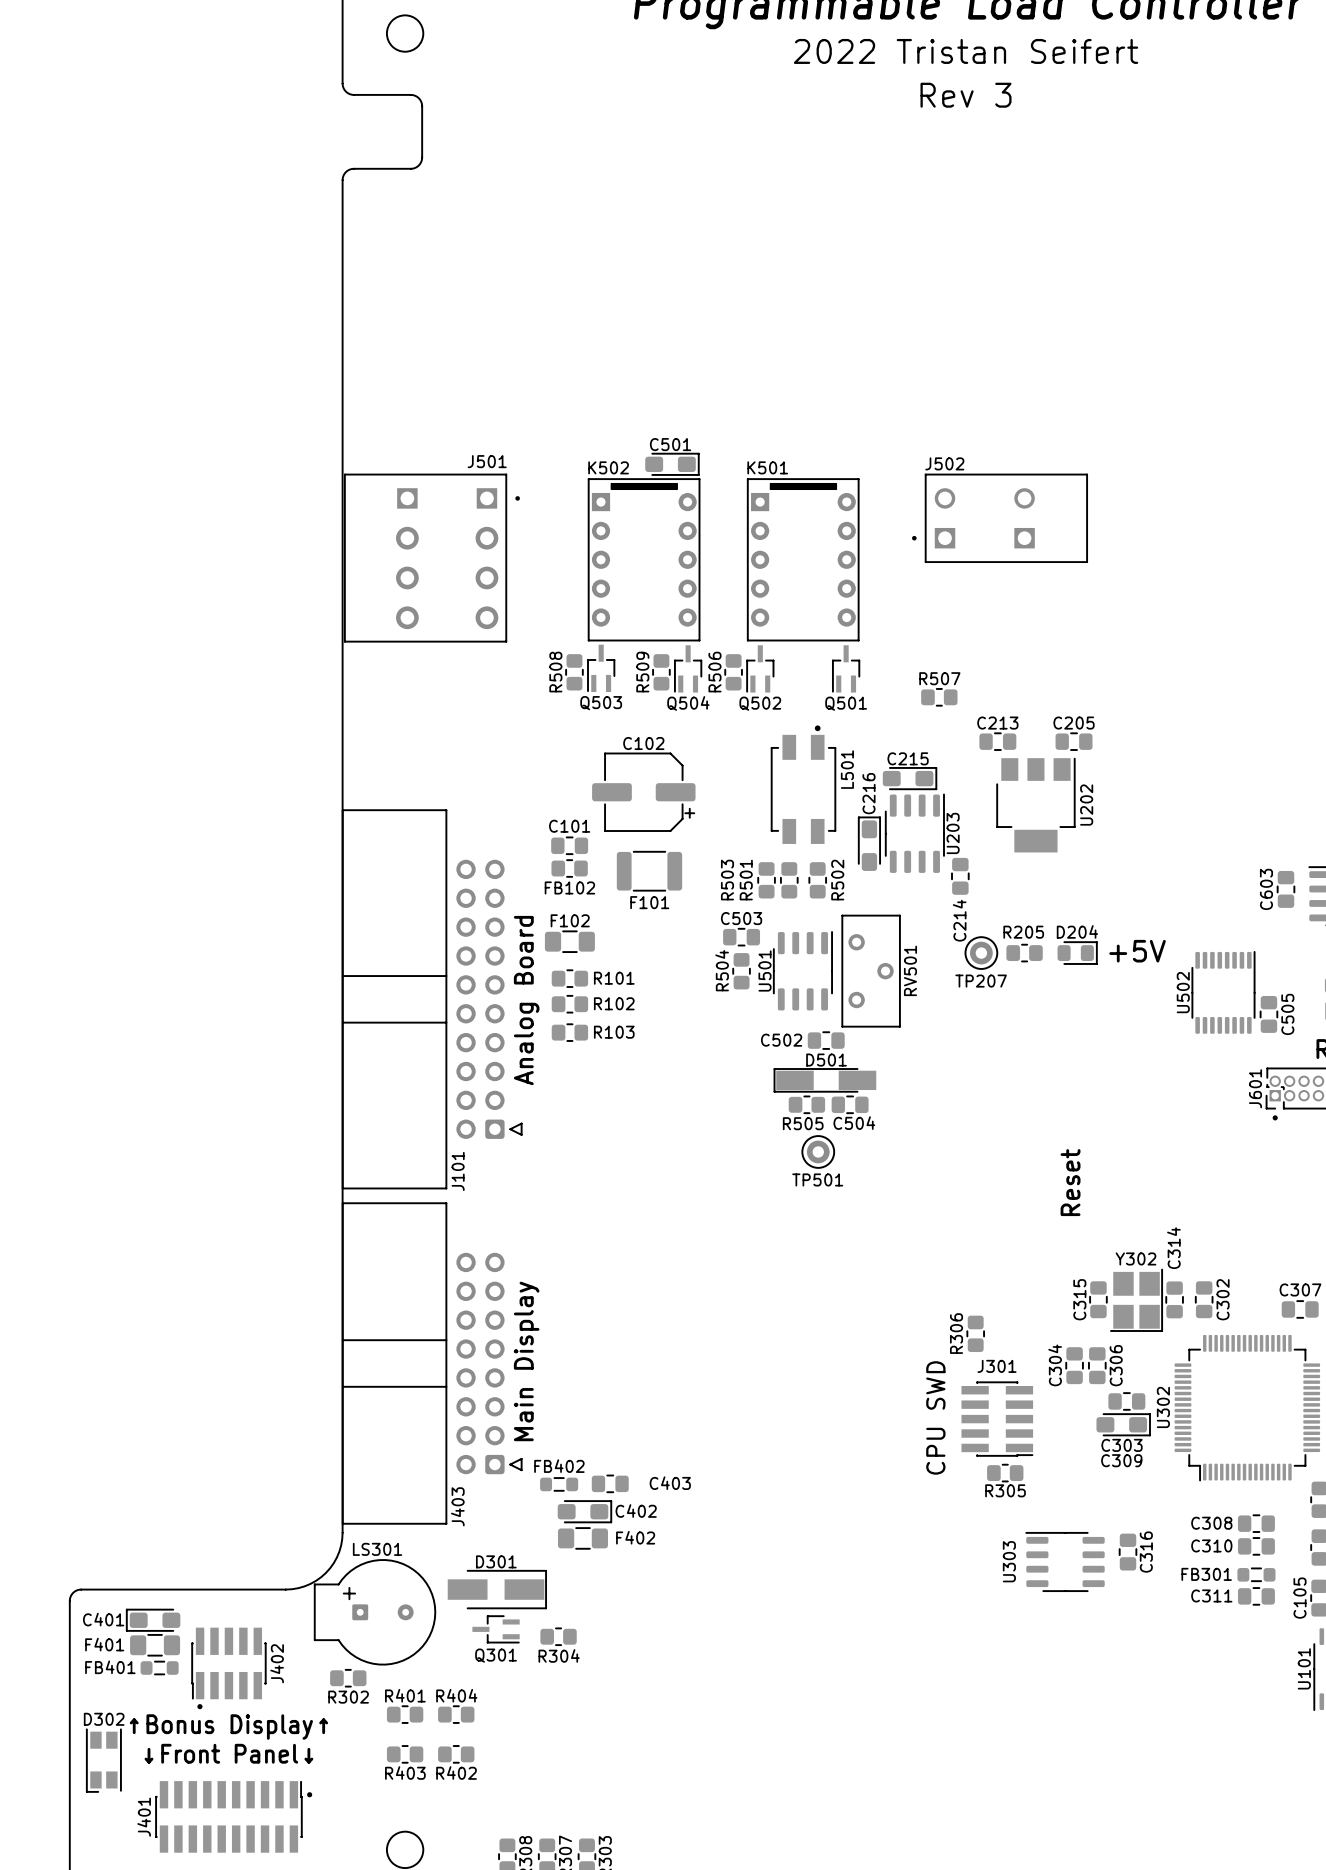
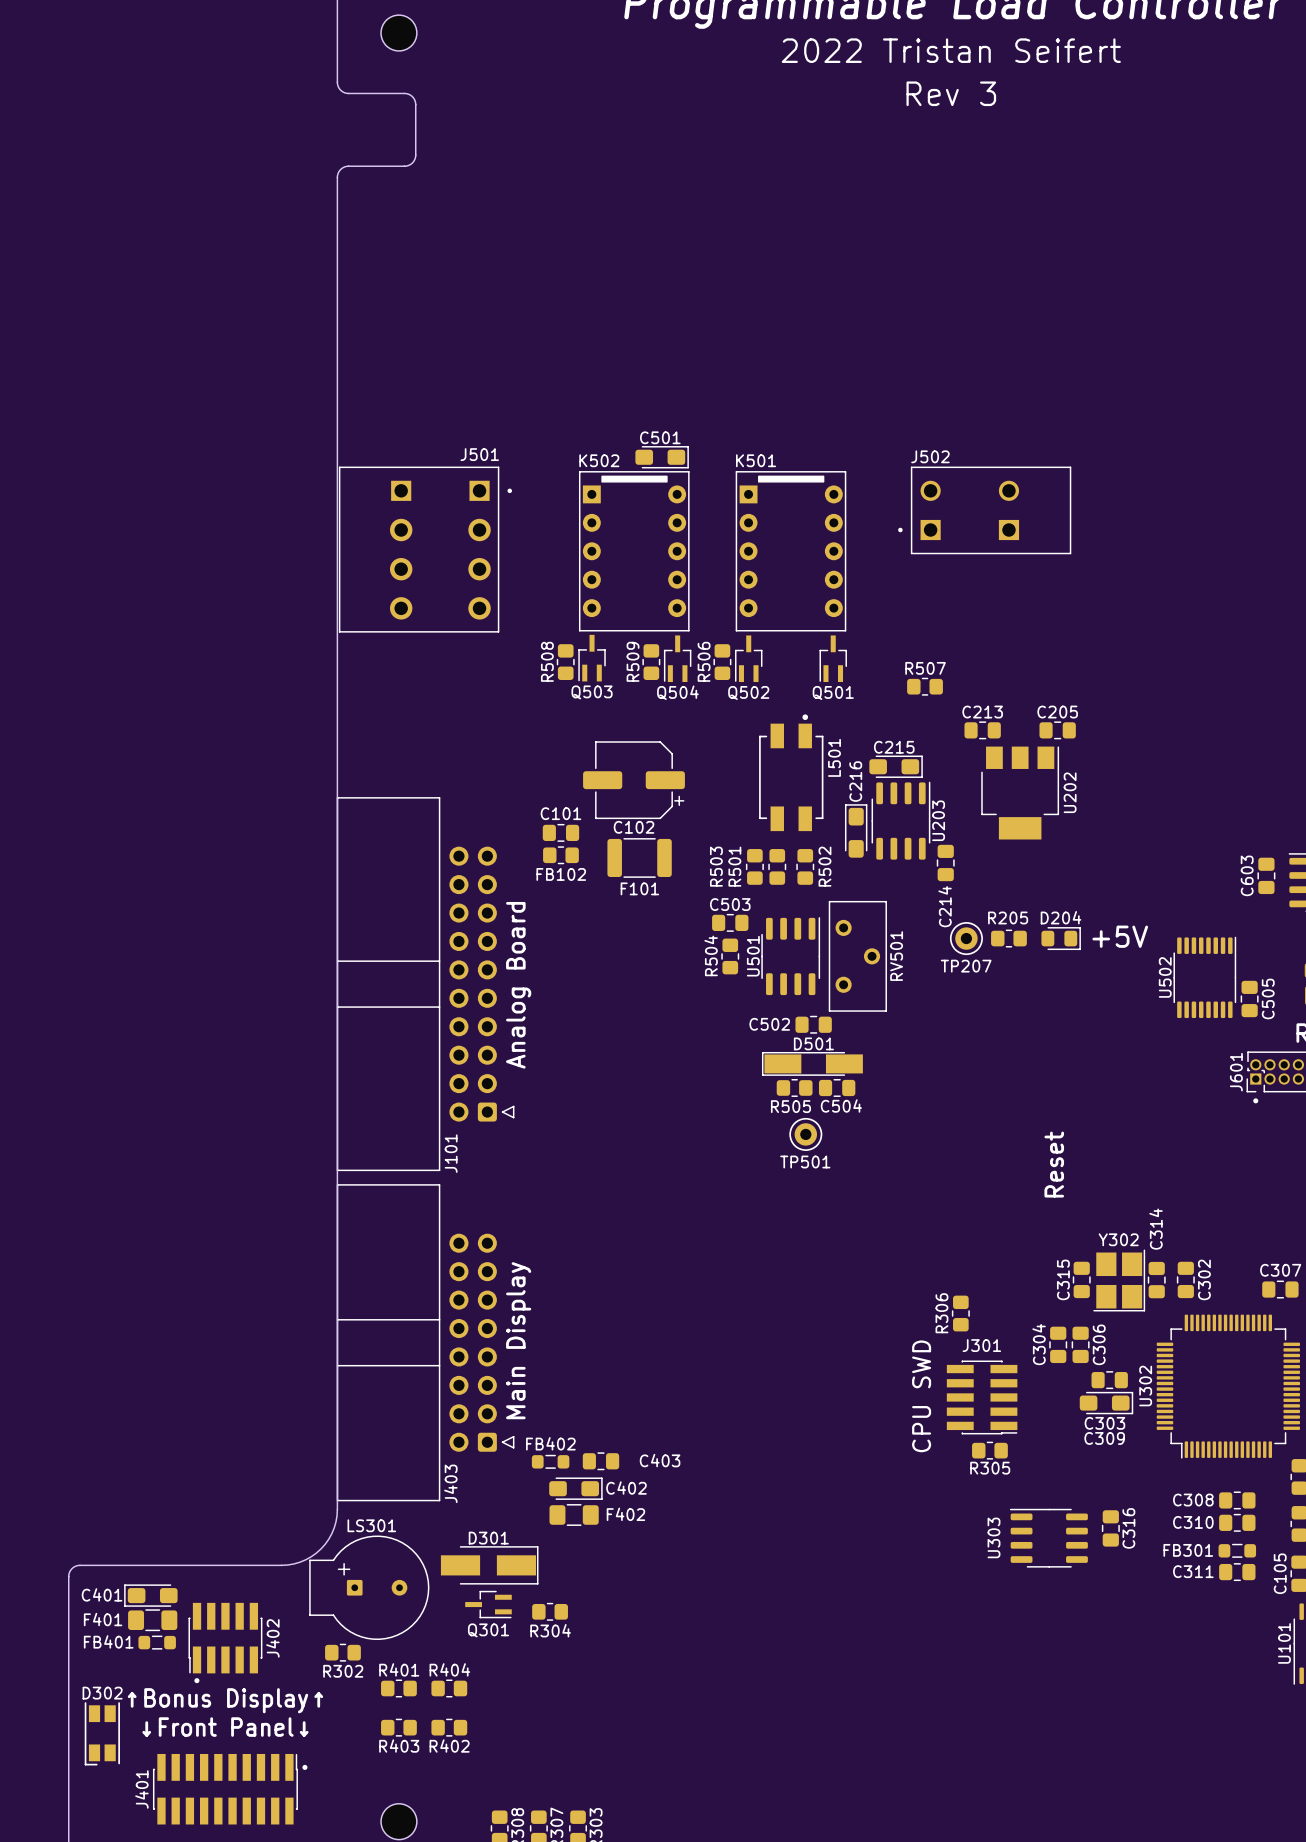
C102 name position: C102 (643, 743) -> C102 (634, 827)
F102: (569, 941) -> none
R101: (569, 978) -> none
R102: (569, 1004) -> none
R103: (569, 1032) -> none

